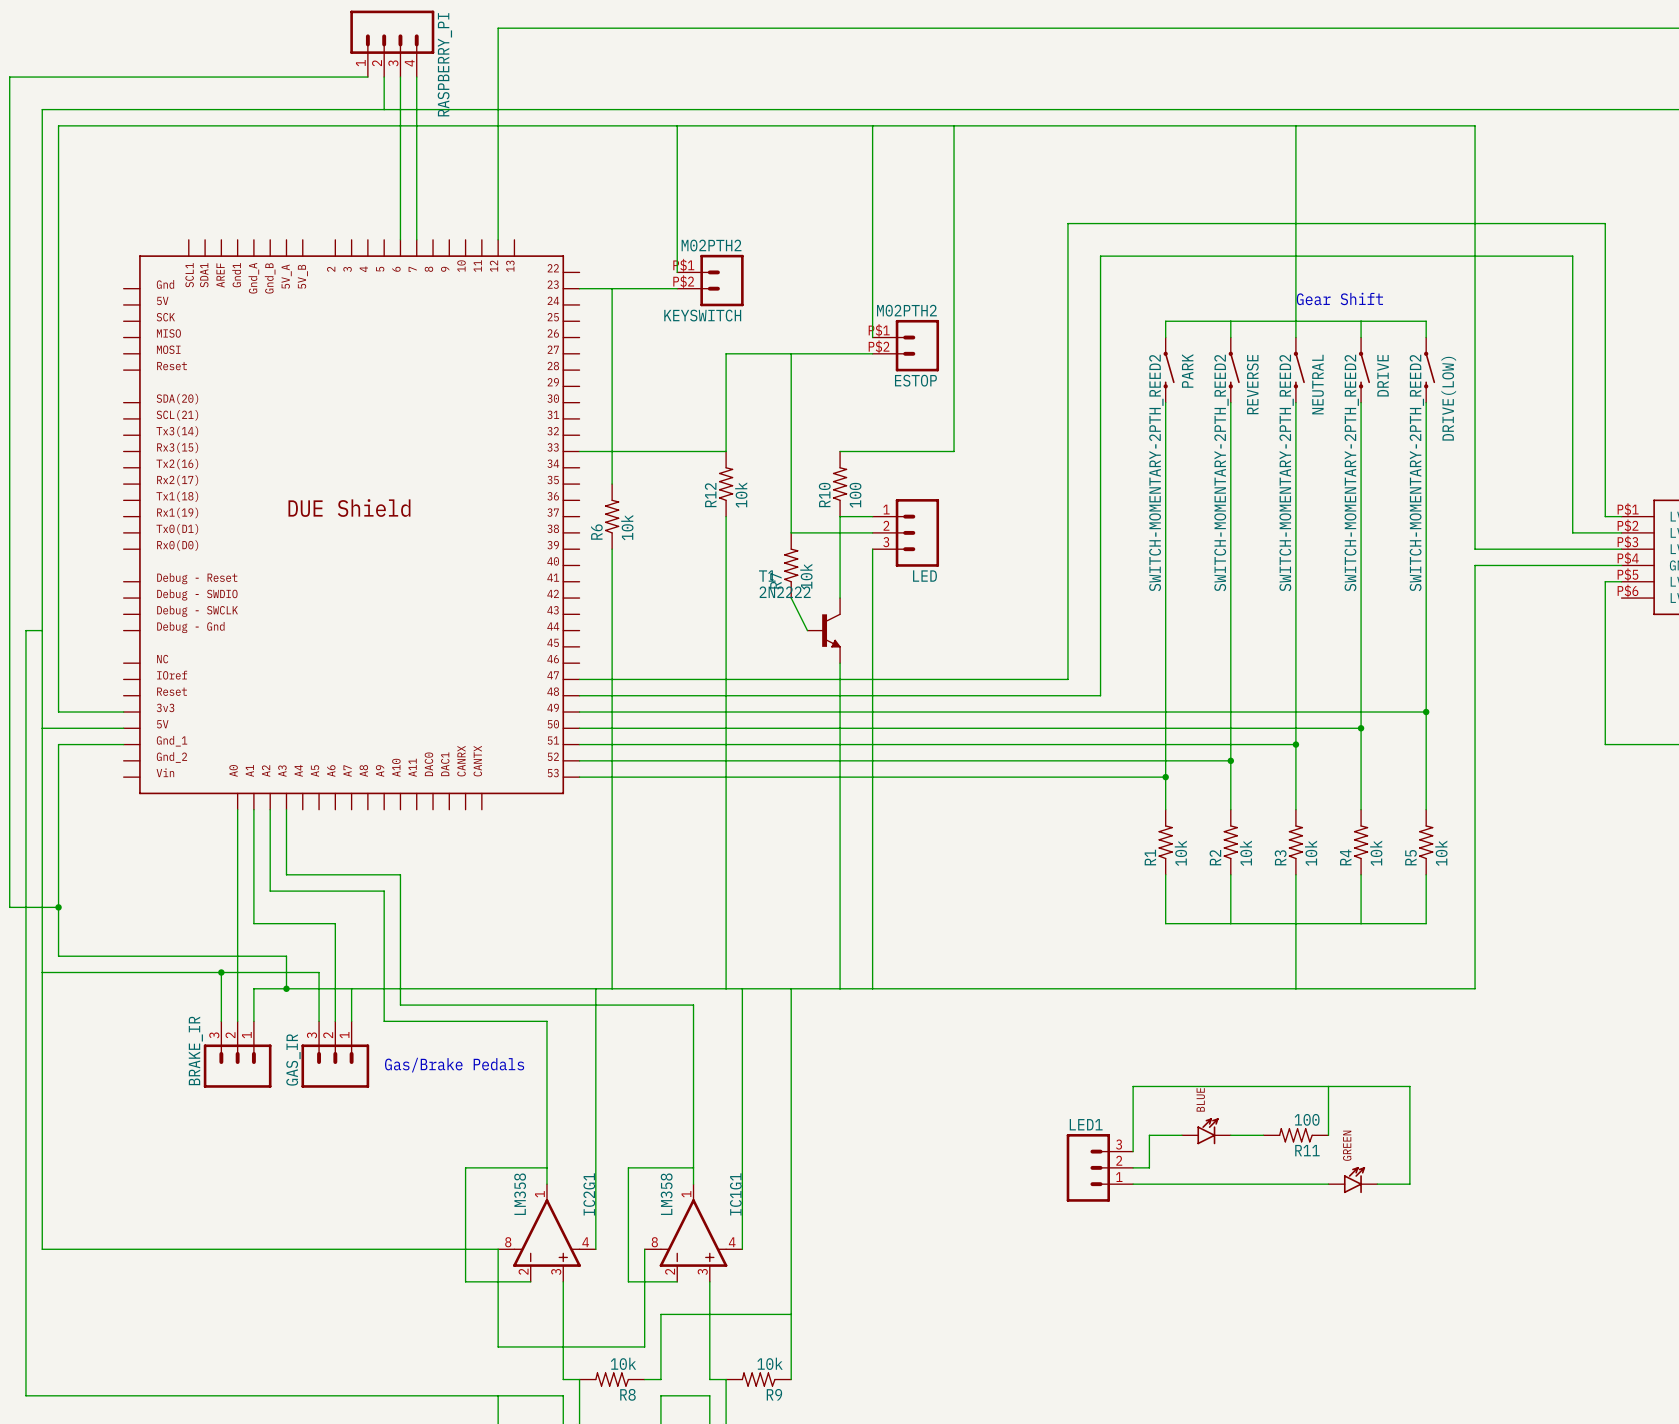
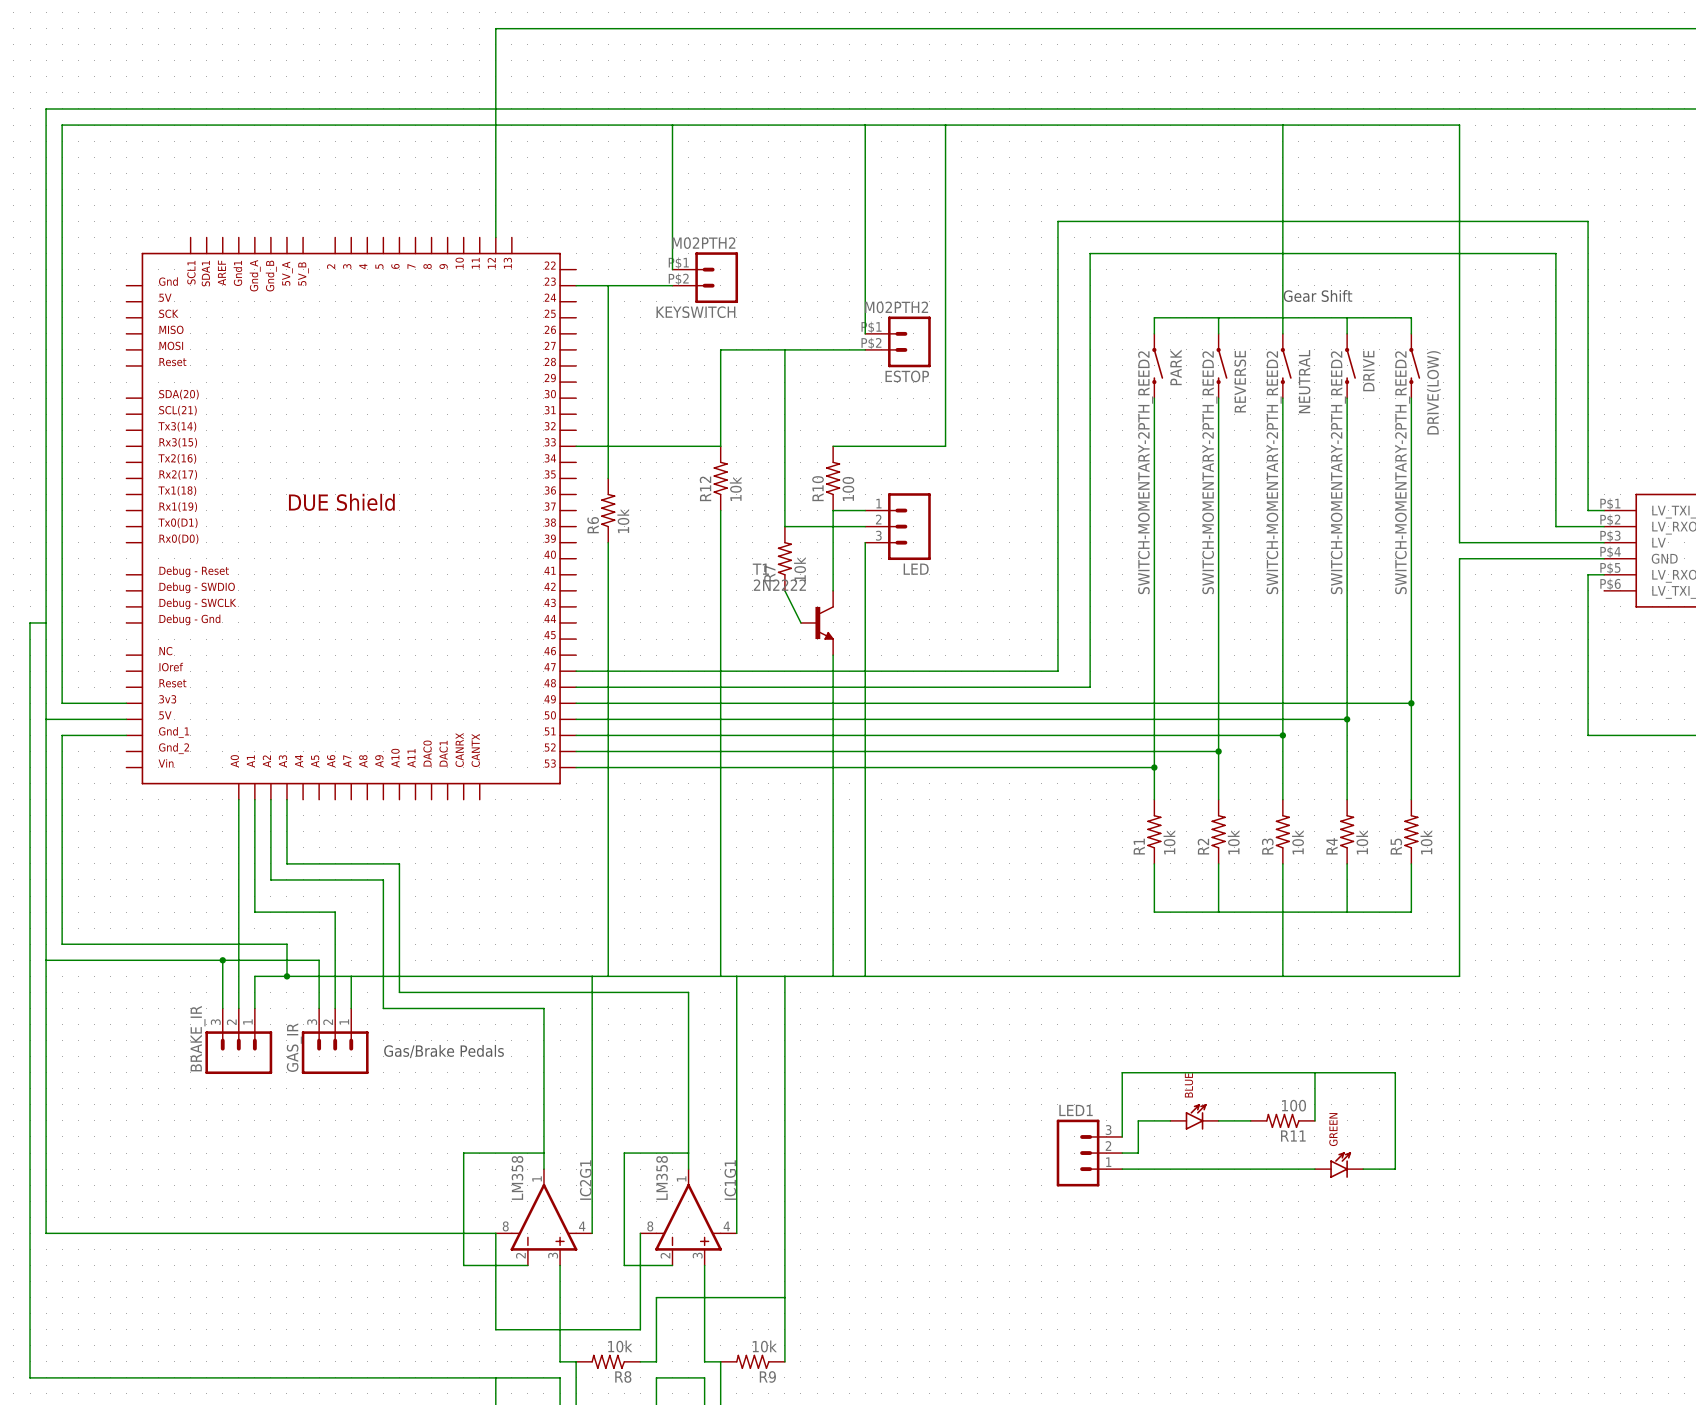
RASPBERRY_PI: (392, 43) -> none
wire: (367, 77) (9, 77) (9, 907) (58, 907) -> none
wire: (384, 77) (384, 109) -> none
wire: (400, 77) (400, 239) -> none
wire: (416, 77) (416, 239) -> none
junction: (58, 907) -> none

